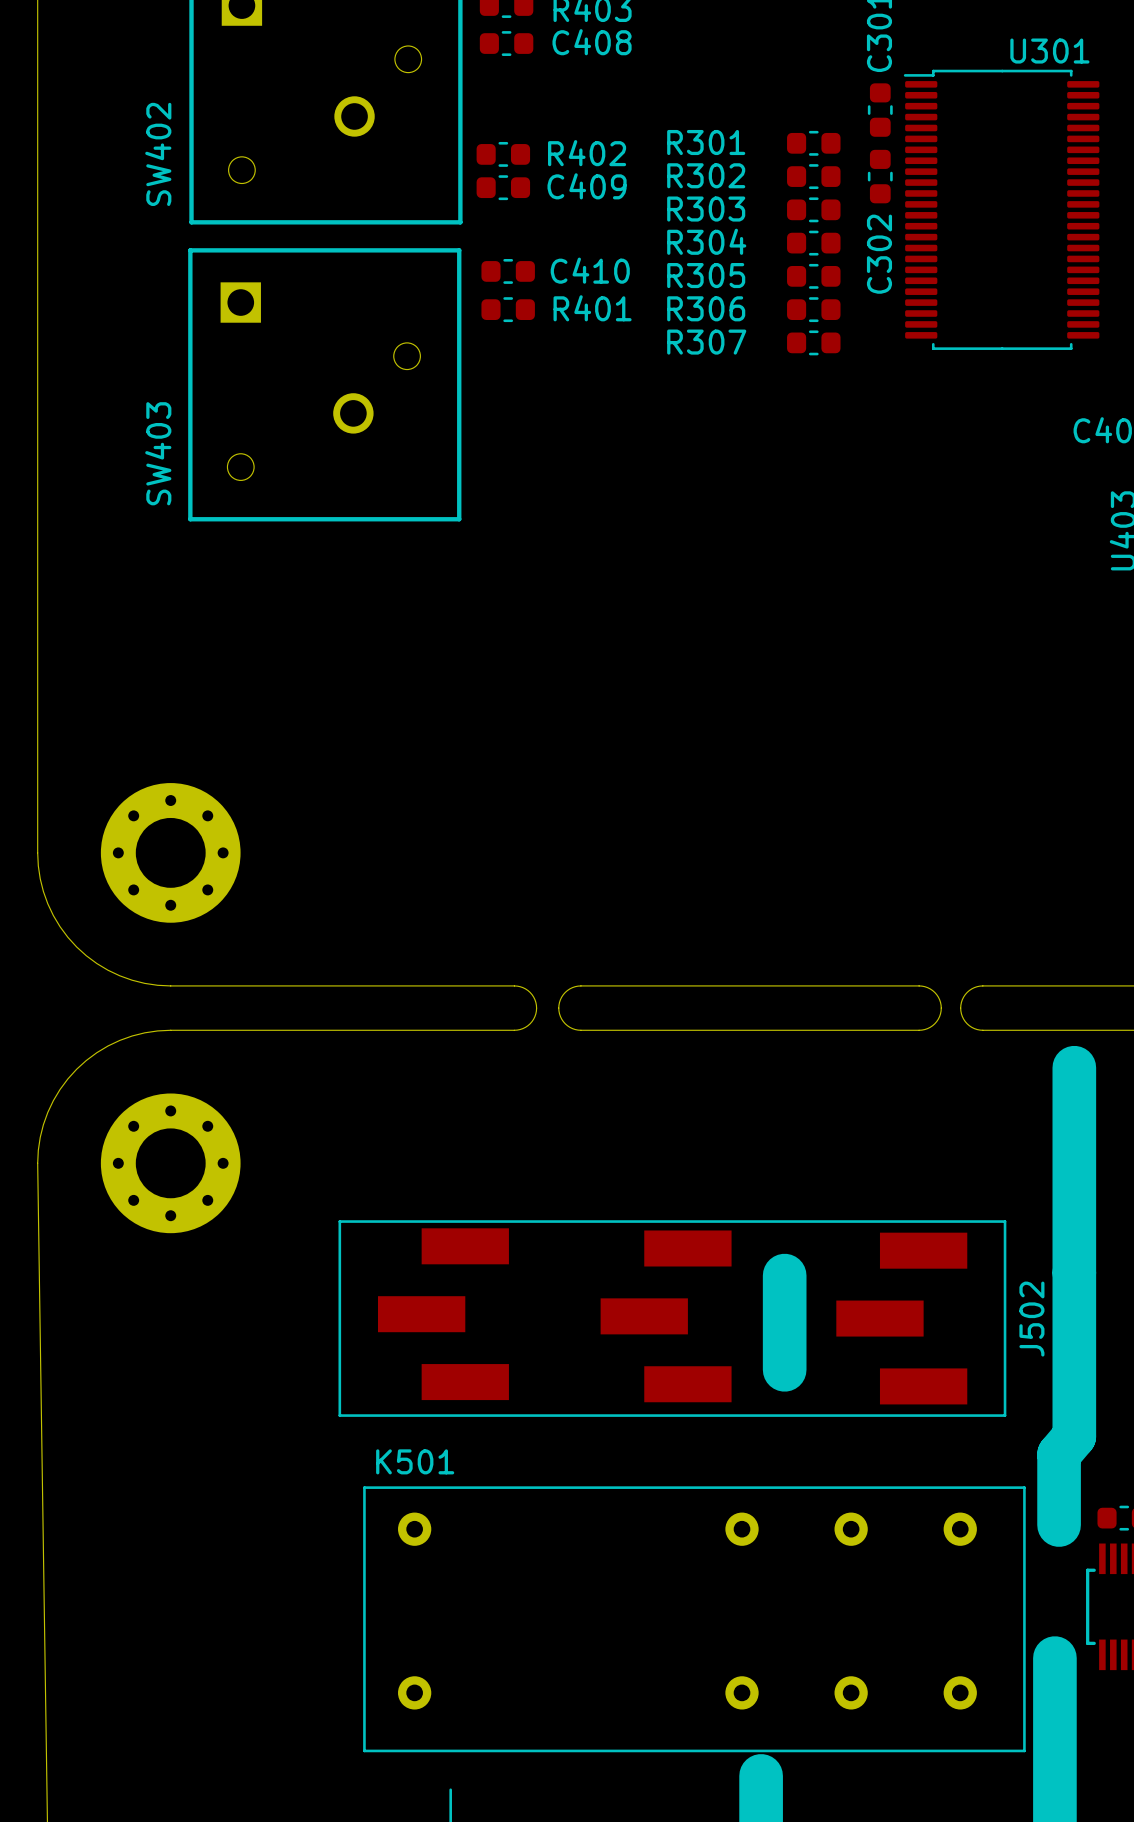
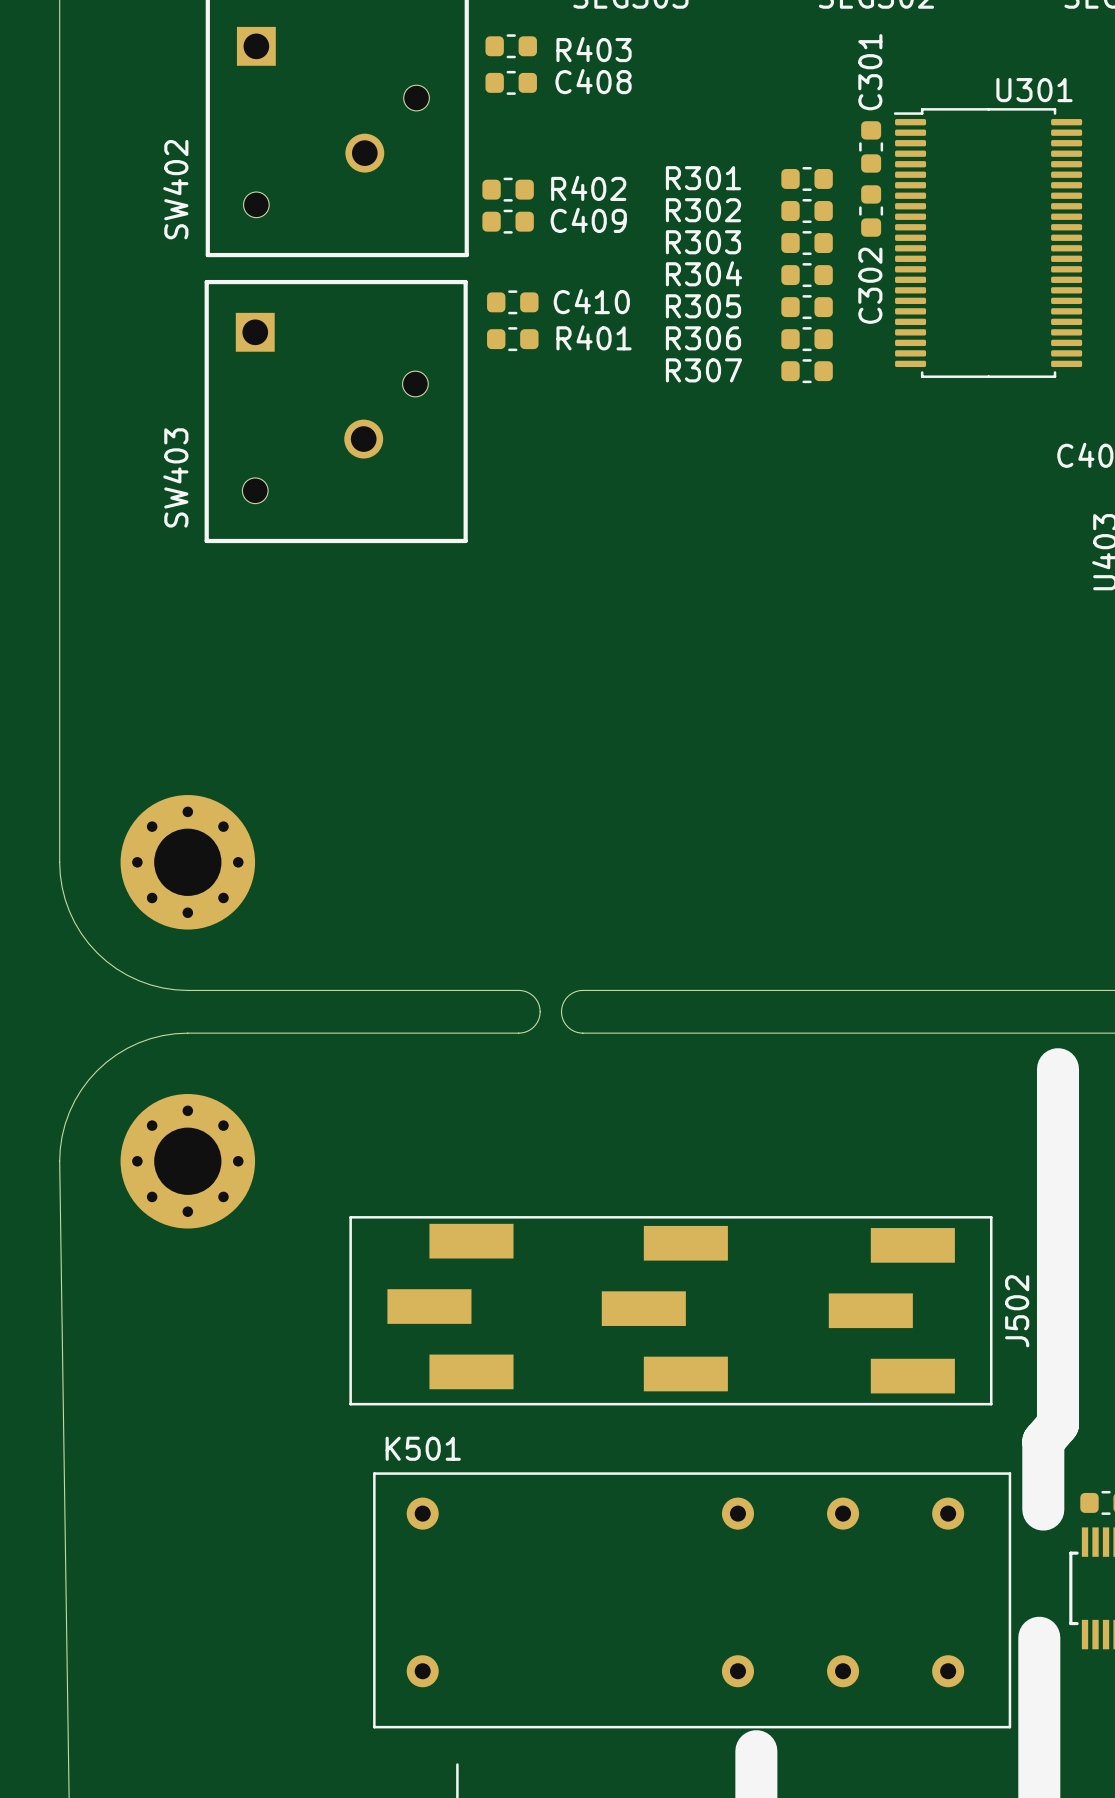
board edge: (919, 985) (927, 987) (934, 992) (939, 999) (941, 1008) (939, 1016) (934, 1023) (927, 1028) (919, 1030) -> (969, 1033) (908, 1033)
board edge: (982, 985) (974, 987) (967, 992) (962, 999) (960, 1008) (962, 1016) (967, 1023) (974, 1028) (982, 1030) -> (969, 990) (908, 990)
line: (784, 1275) (784, 1369) -> none

